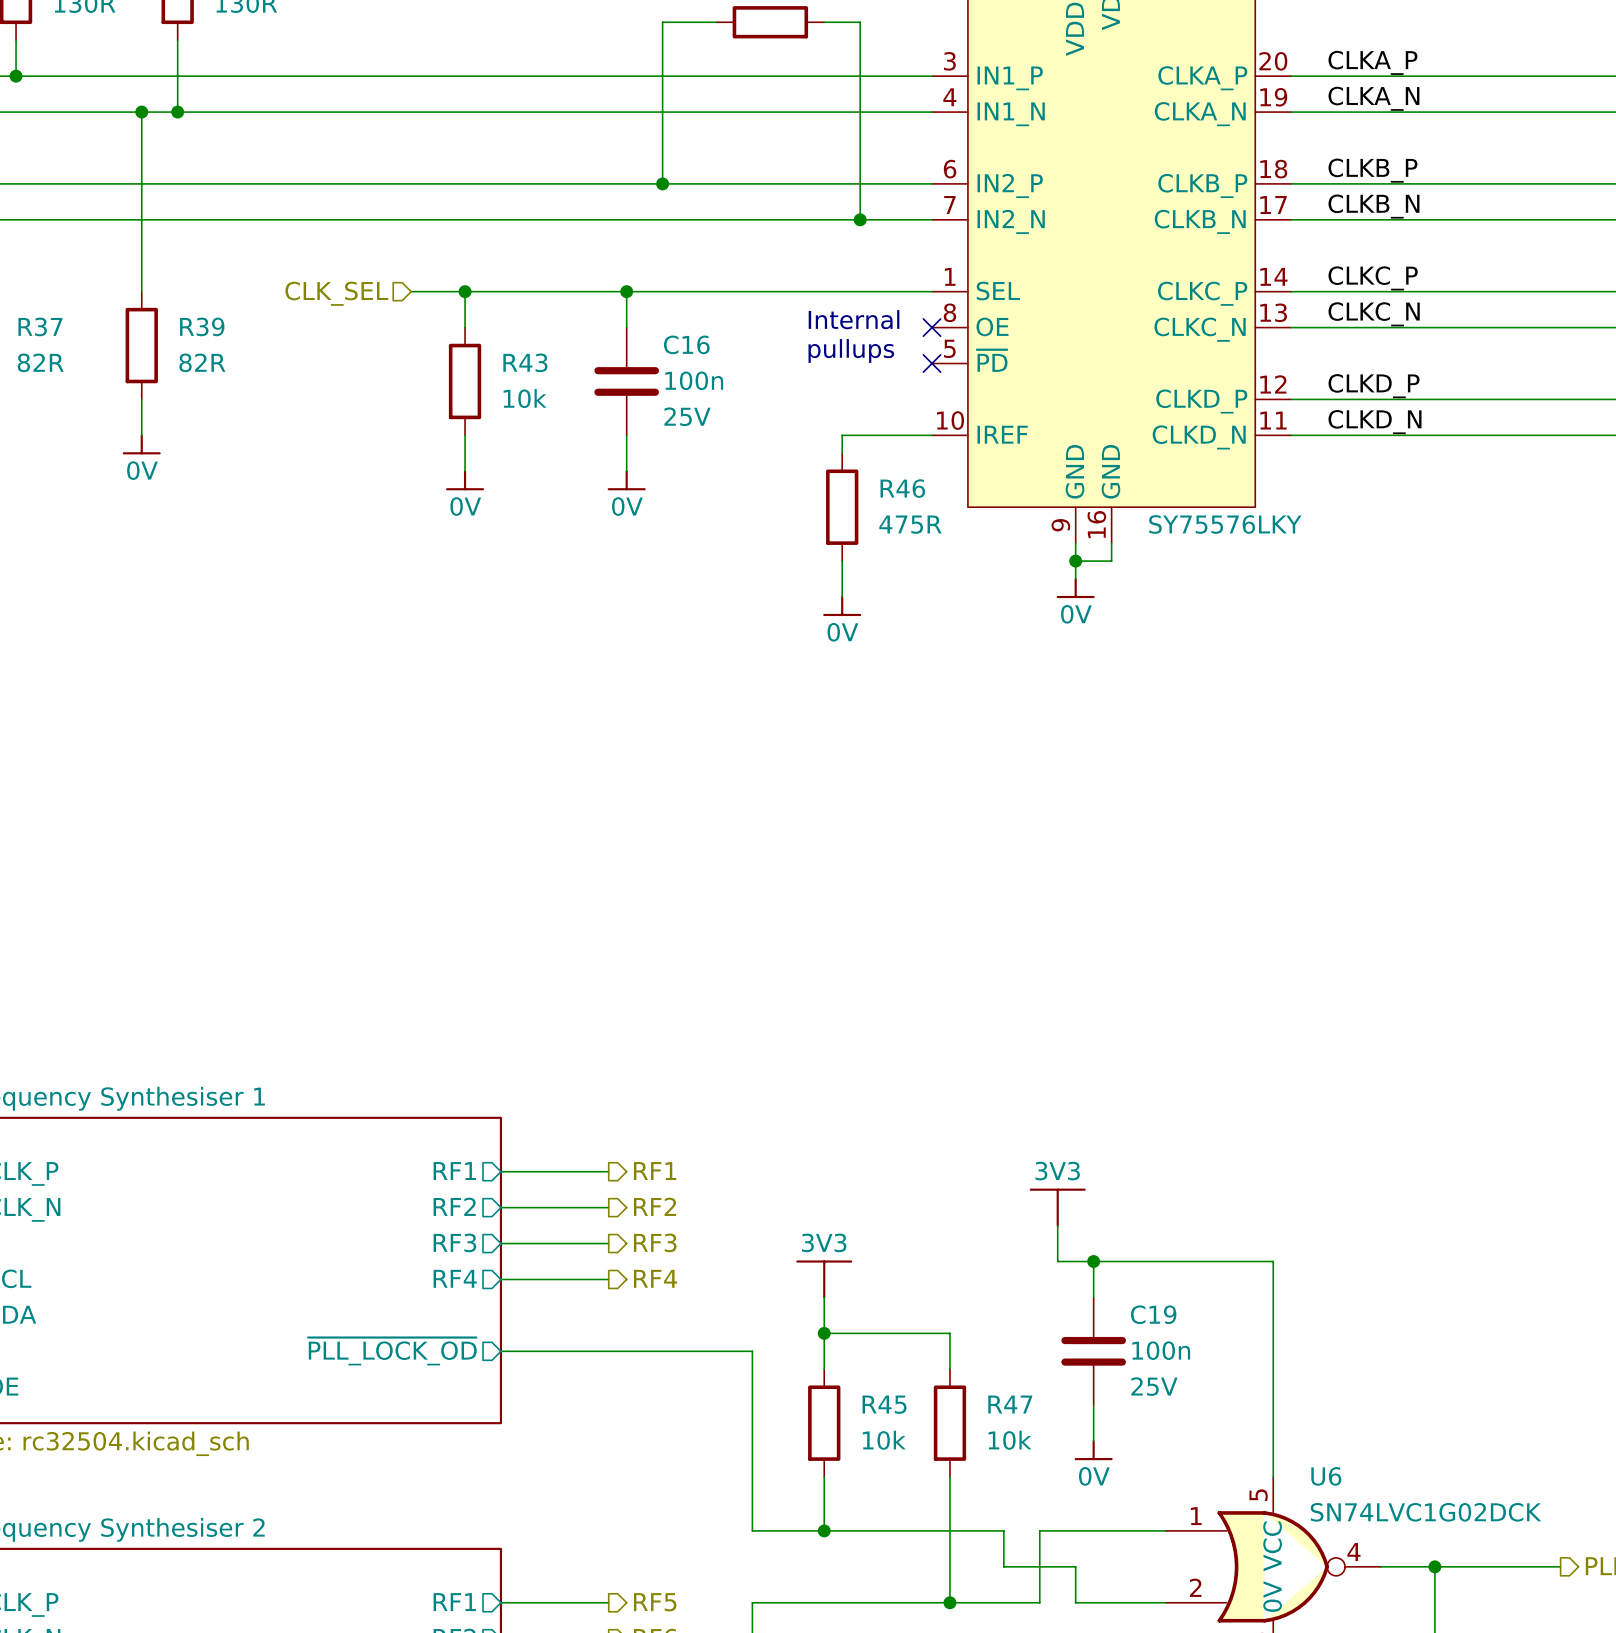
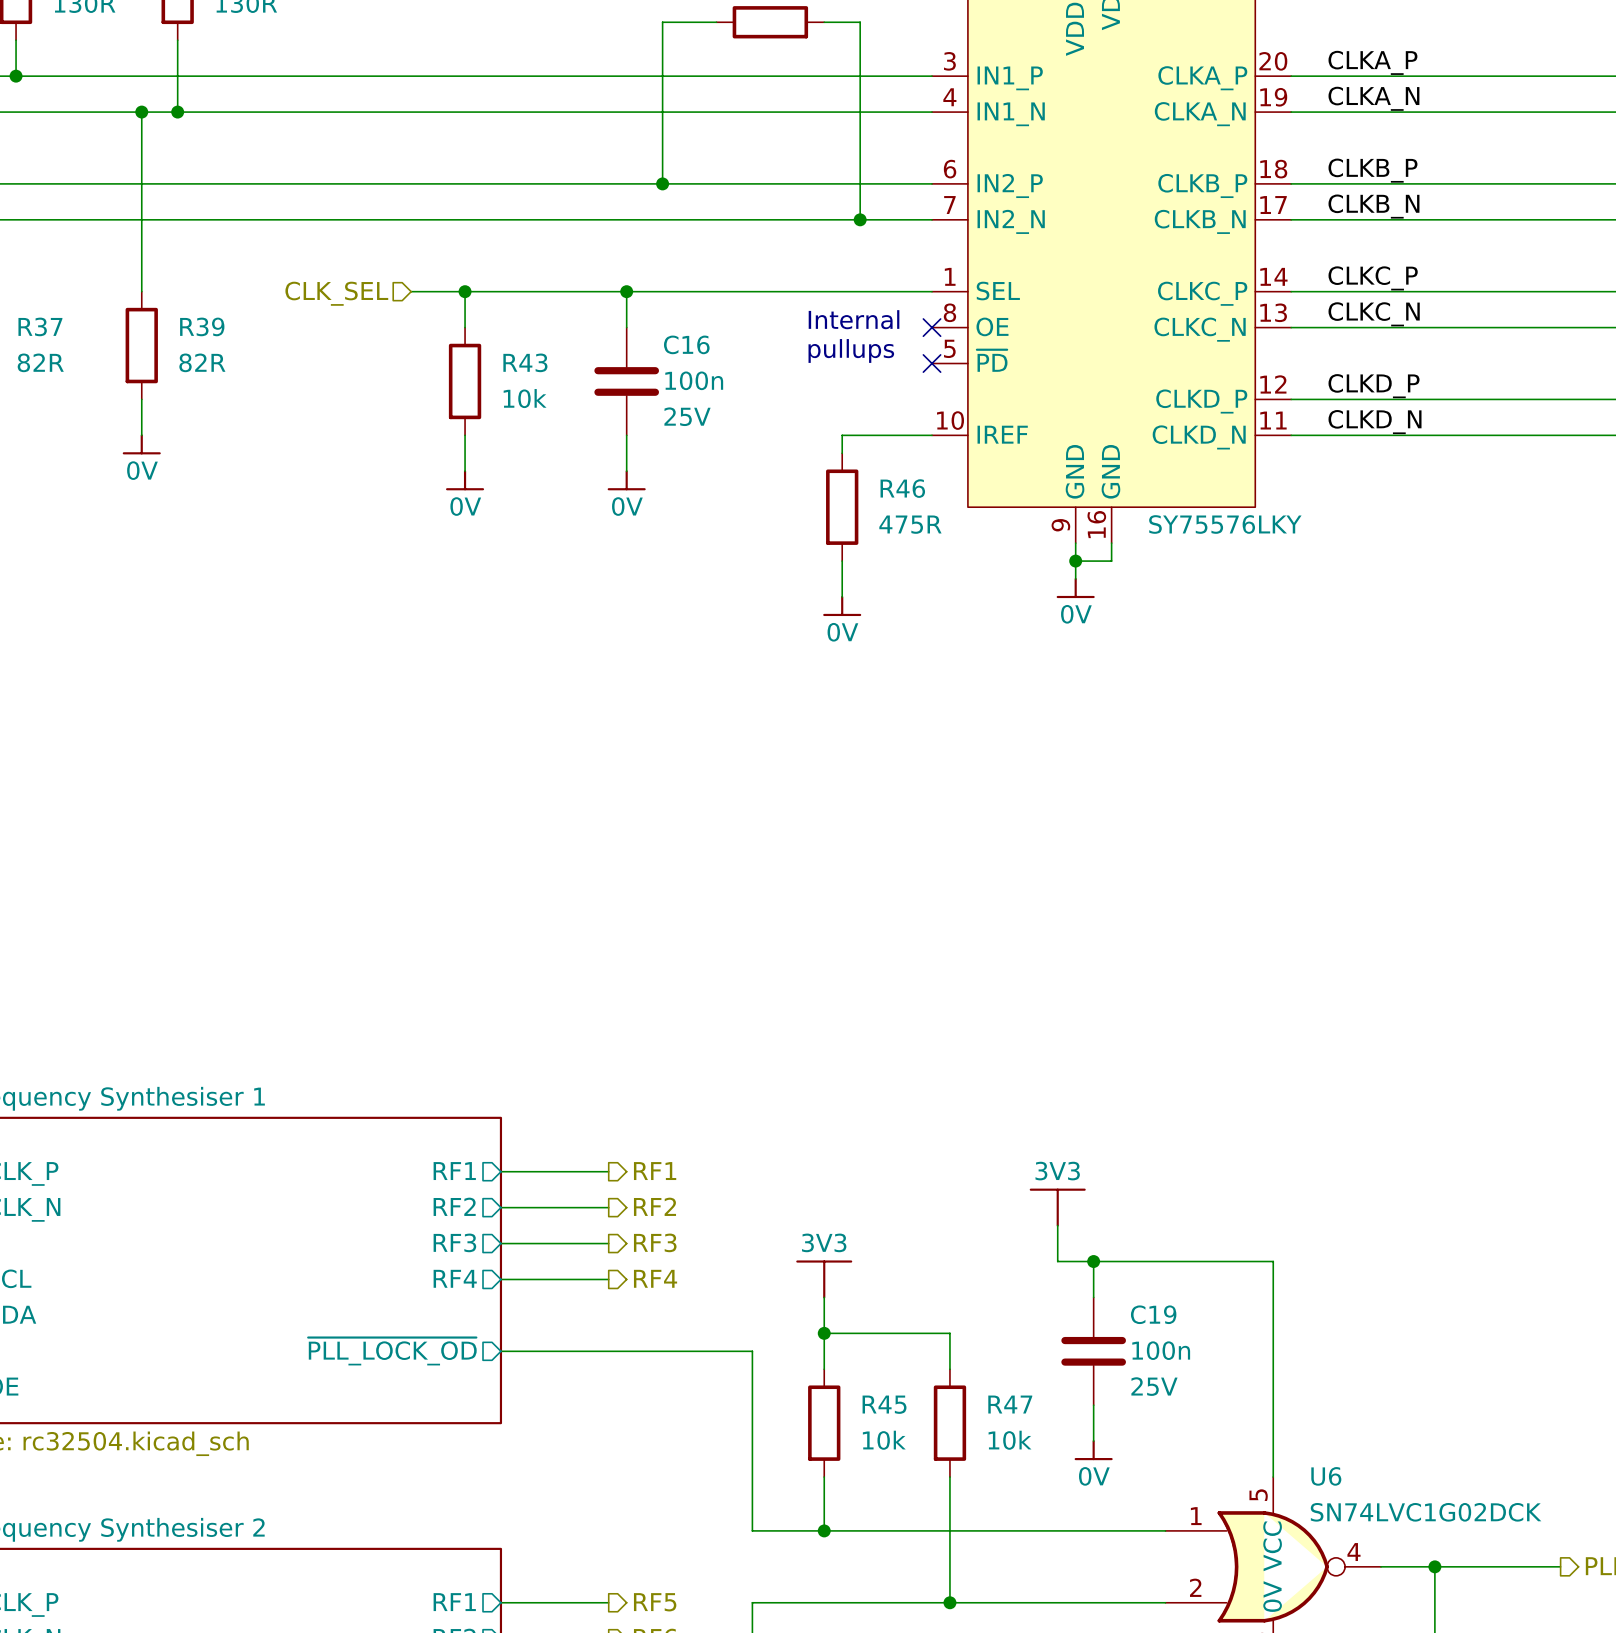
wire: (1003, 1530) (1003, 1566) (1075, 1566) (1075, 1602) -> (1003, 1530) (1039, 1530)
wire: (1039, 1530) (1039, 1602) -> (1075, 1602) (1039, 1602)

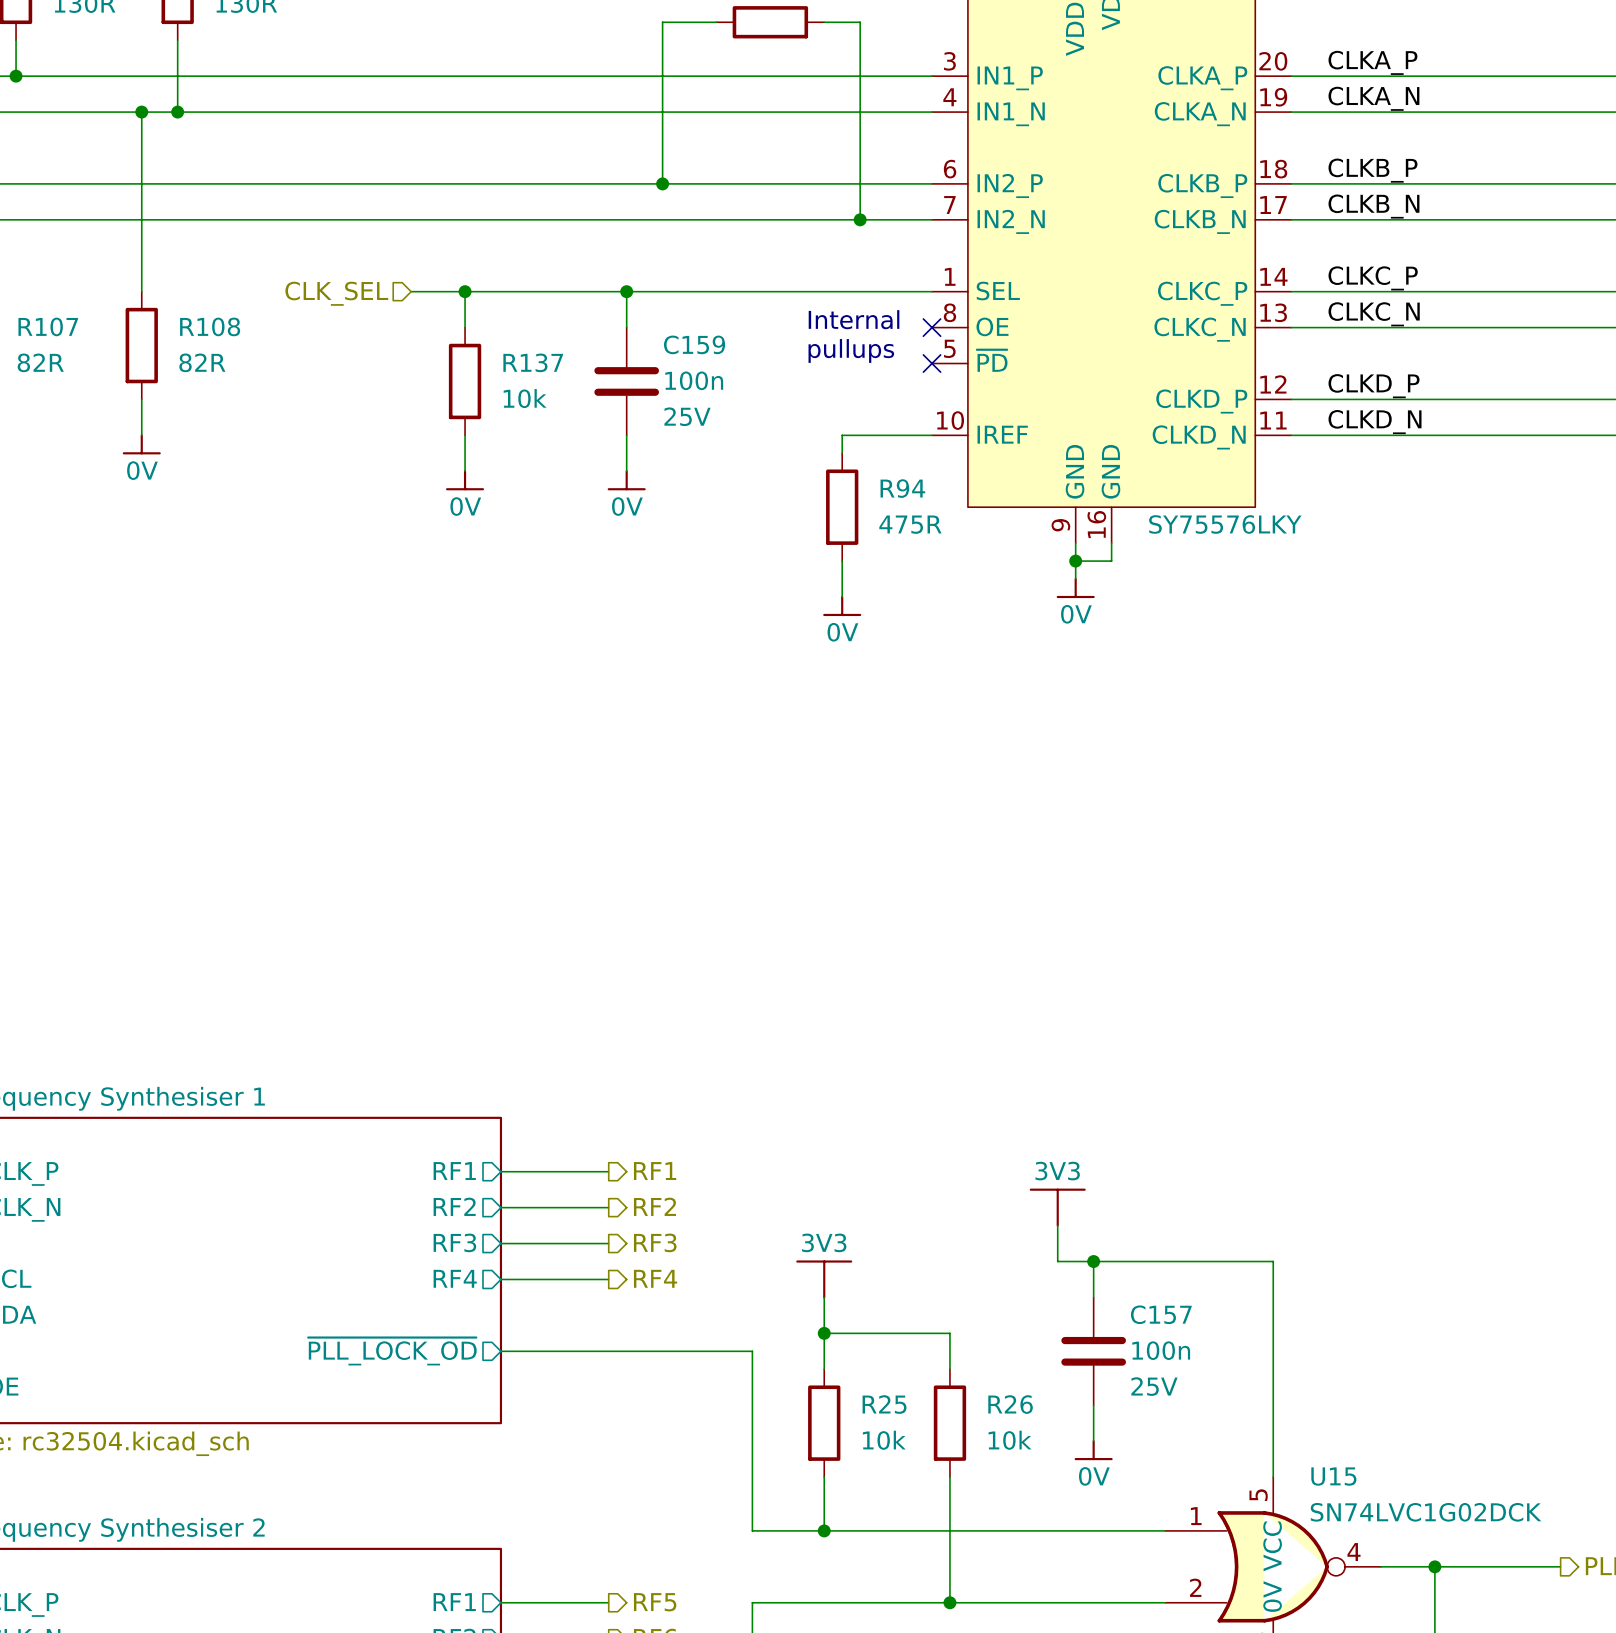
R37 name: R37 (40, 326) -> R107 (48, 326)
R39 name: R39 (202, 326) -> R108 (210, 326)
C16 name: C16 (686, 344) -> C159 (694, 344)
R43 name: R43 (525, 362) -> R137 (533, 362)
R46 name: R46 (902, 488) -> R94 (902, 488)
C19 name: C19 (1153, 1314) -> C157 (1161, 1314)
R45 name: R45 (884, 1404) -> R25 (884, 1404)
R47 name: R47 (1010, 1404) -> R26 (1010, 1404)
U6 name: U6 (1326, 1476) -> U15 (1333, 1476)

